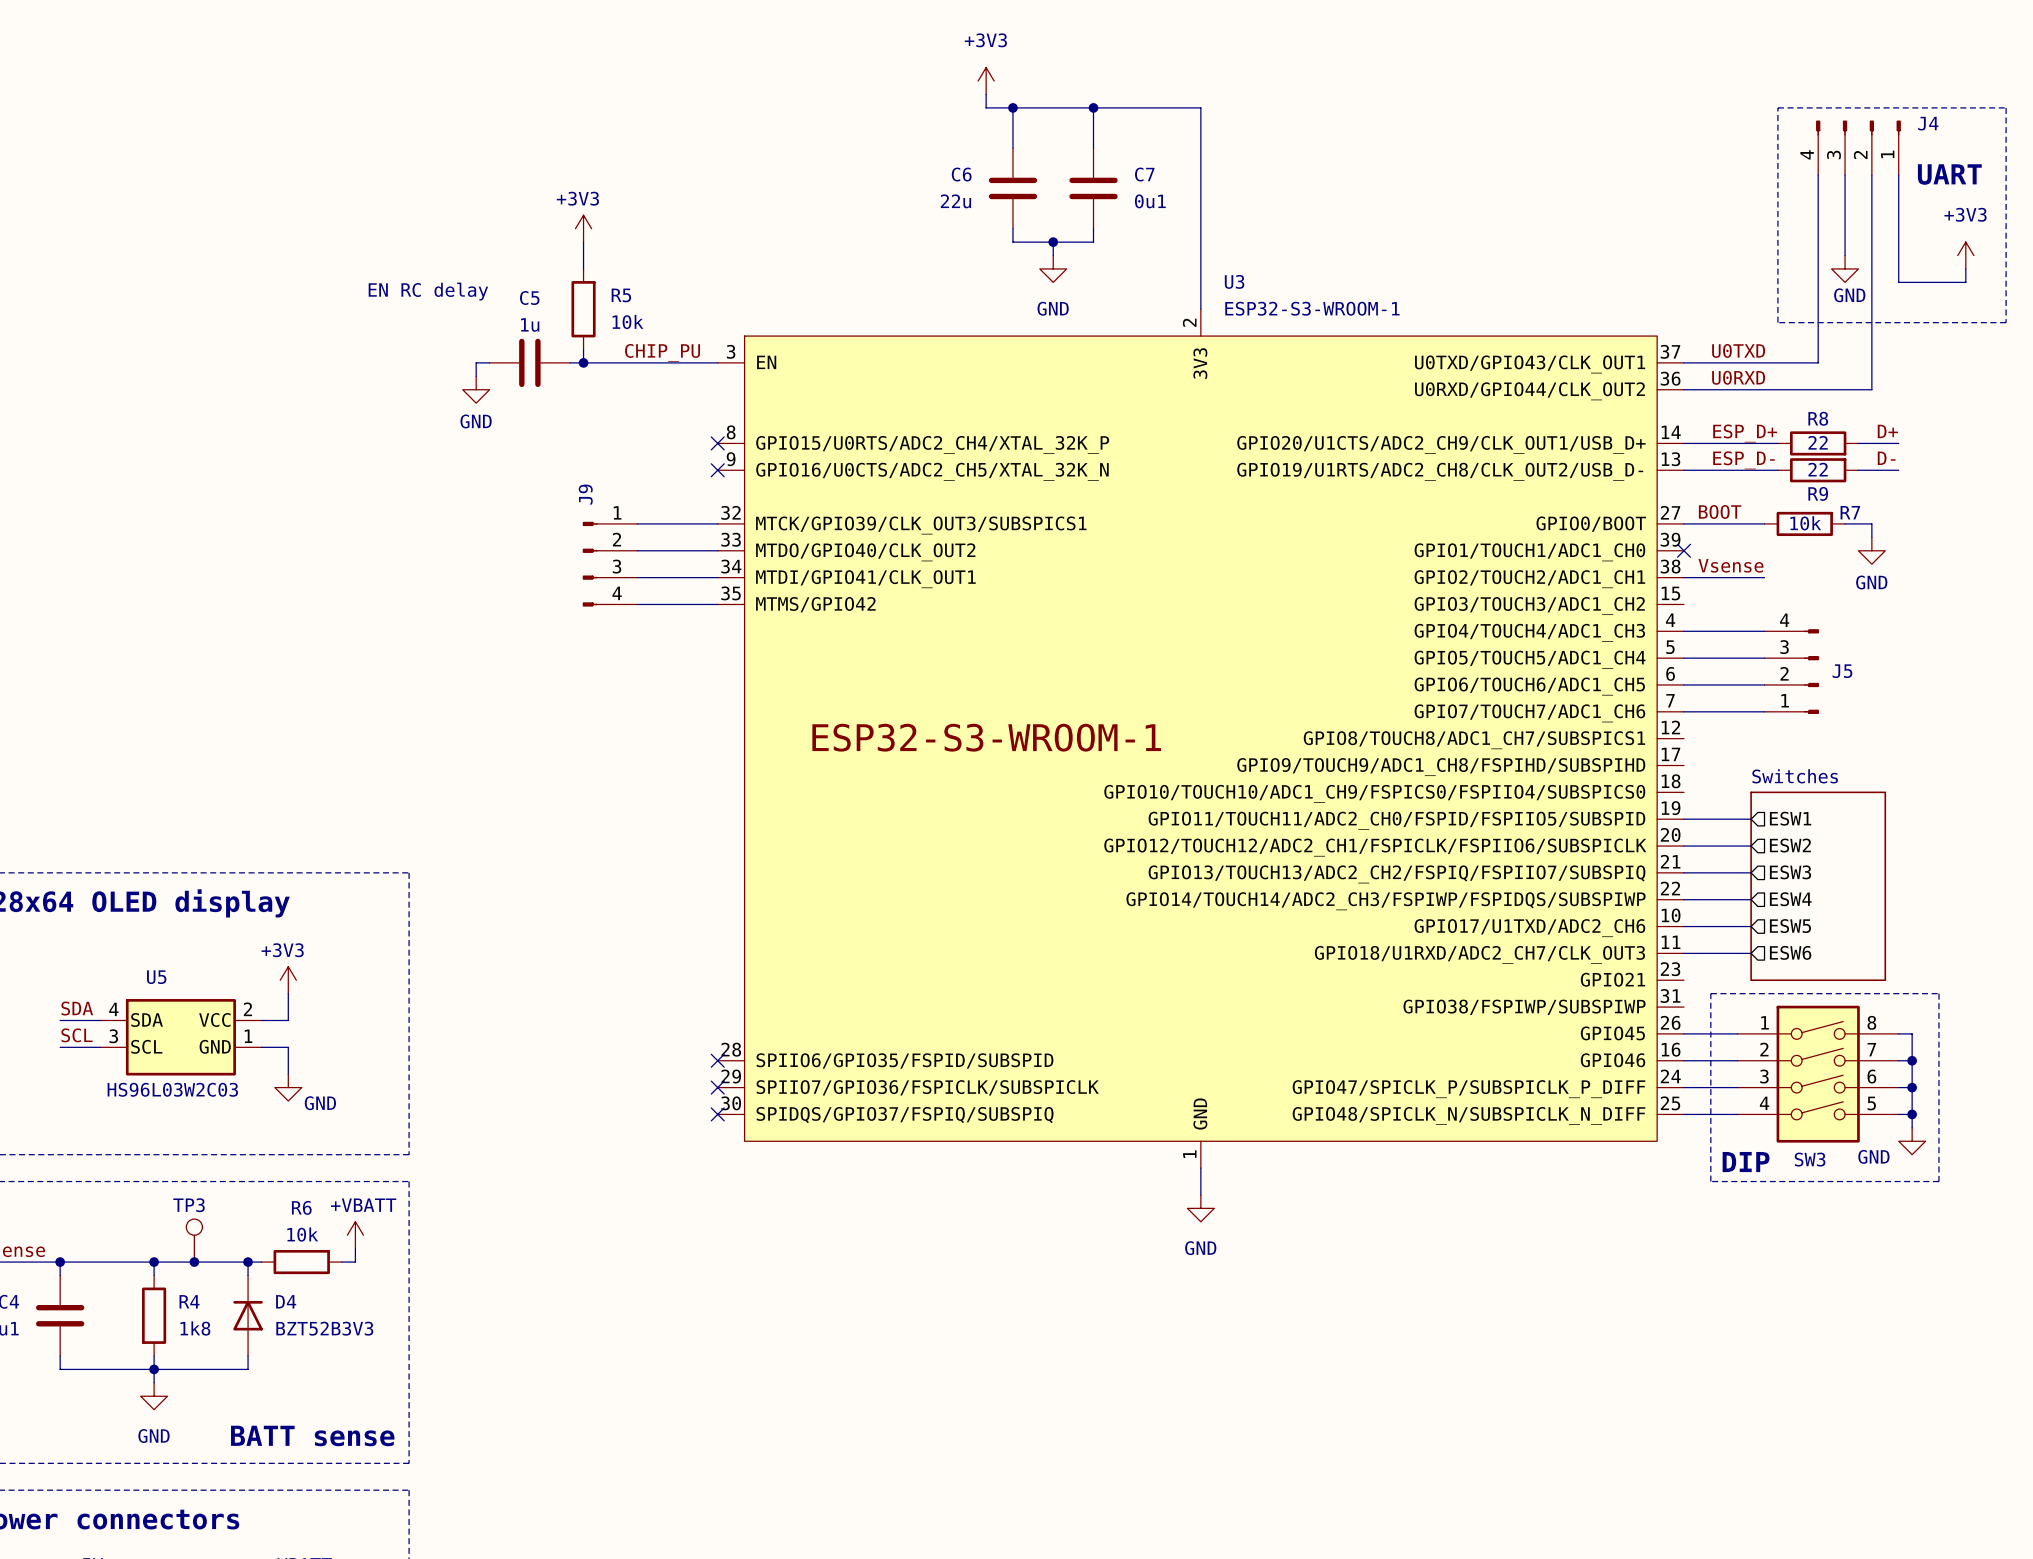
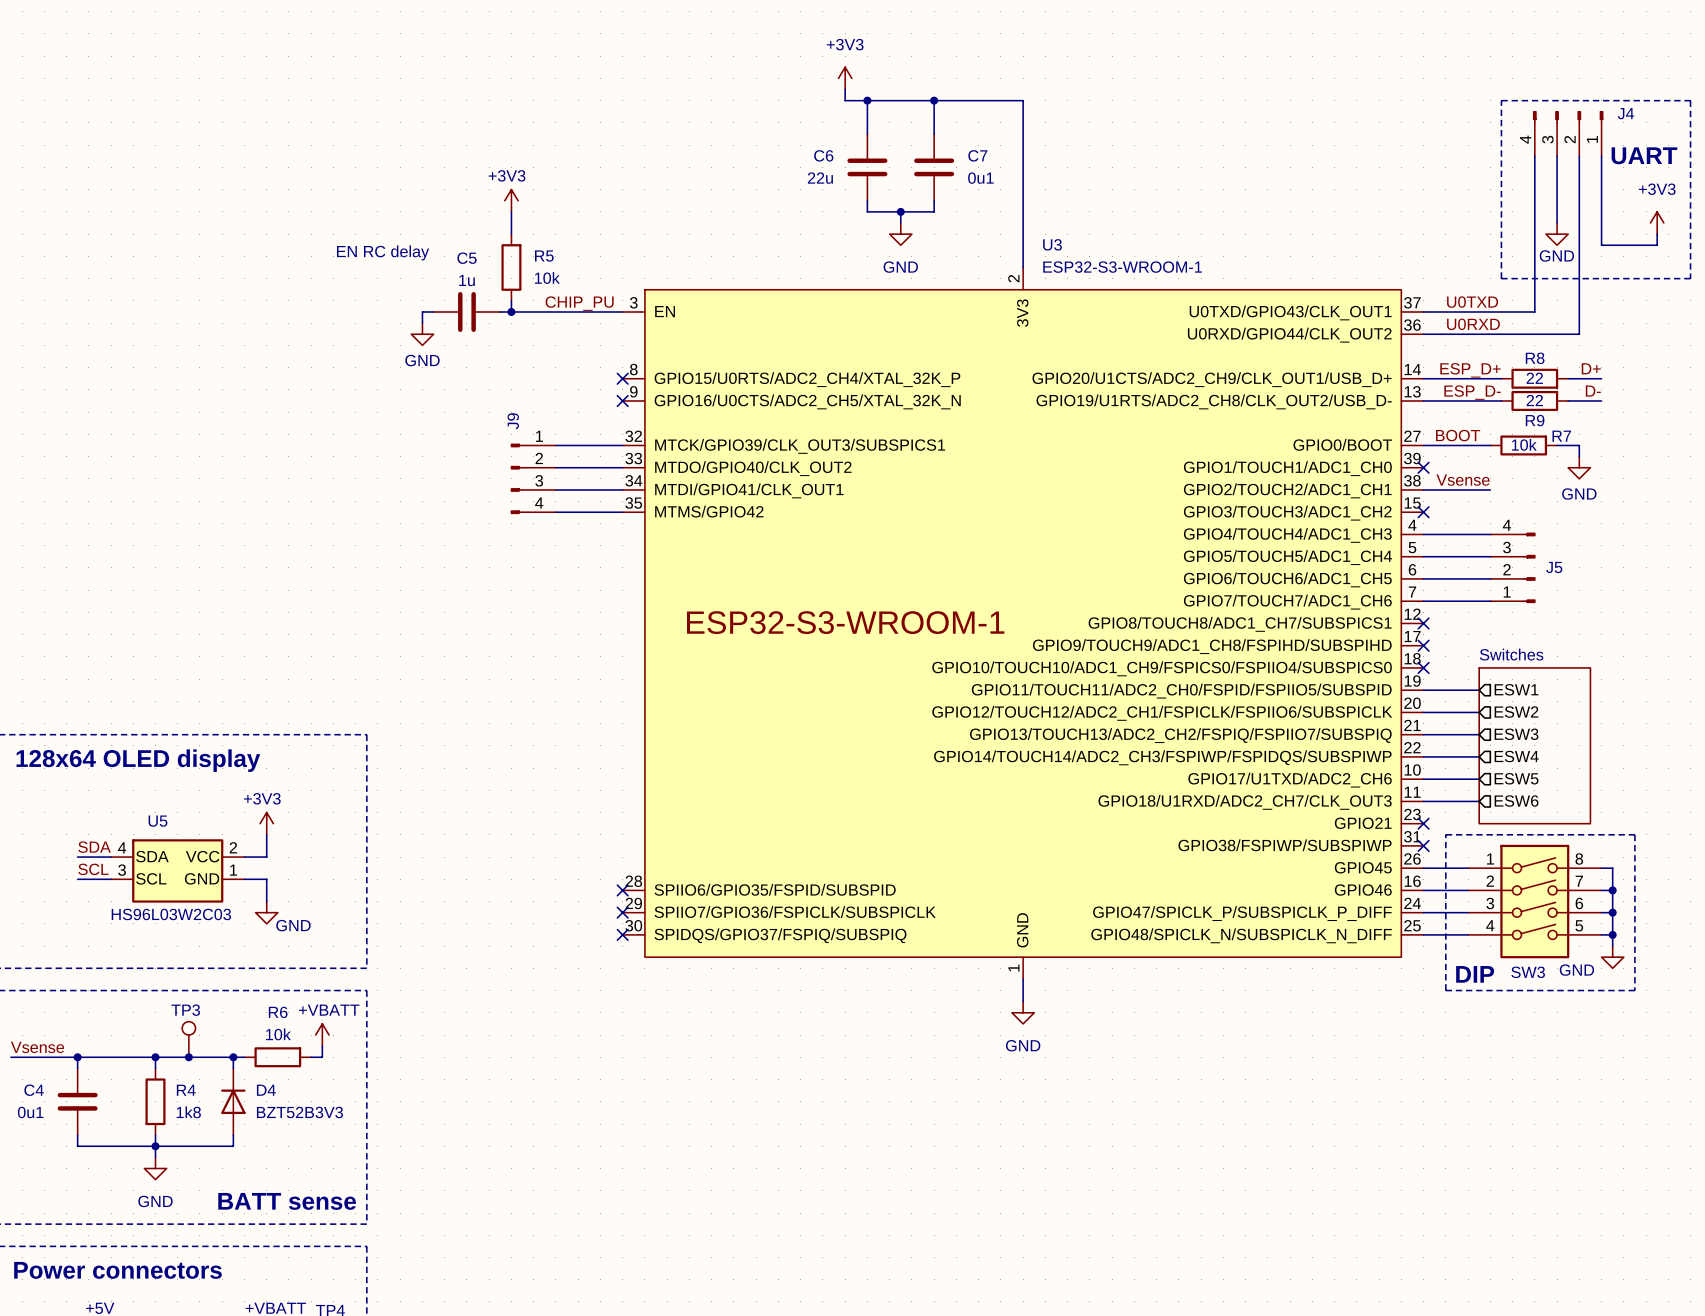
no-connect mark: none -> (1423, 512)
no-connect mark: none -> (1423, 623)
no-connect mark: none -> (1423, 645)
no-connect mark: none -> (1423, 667)
no-connect mark: none -> (1423, 823)
no-connect mark: none -> (1423, 845)

